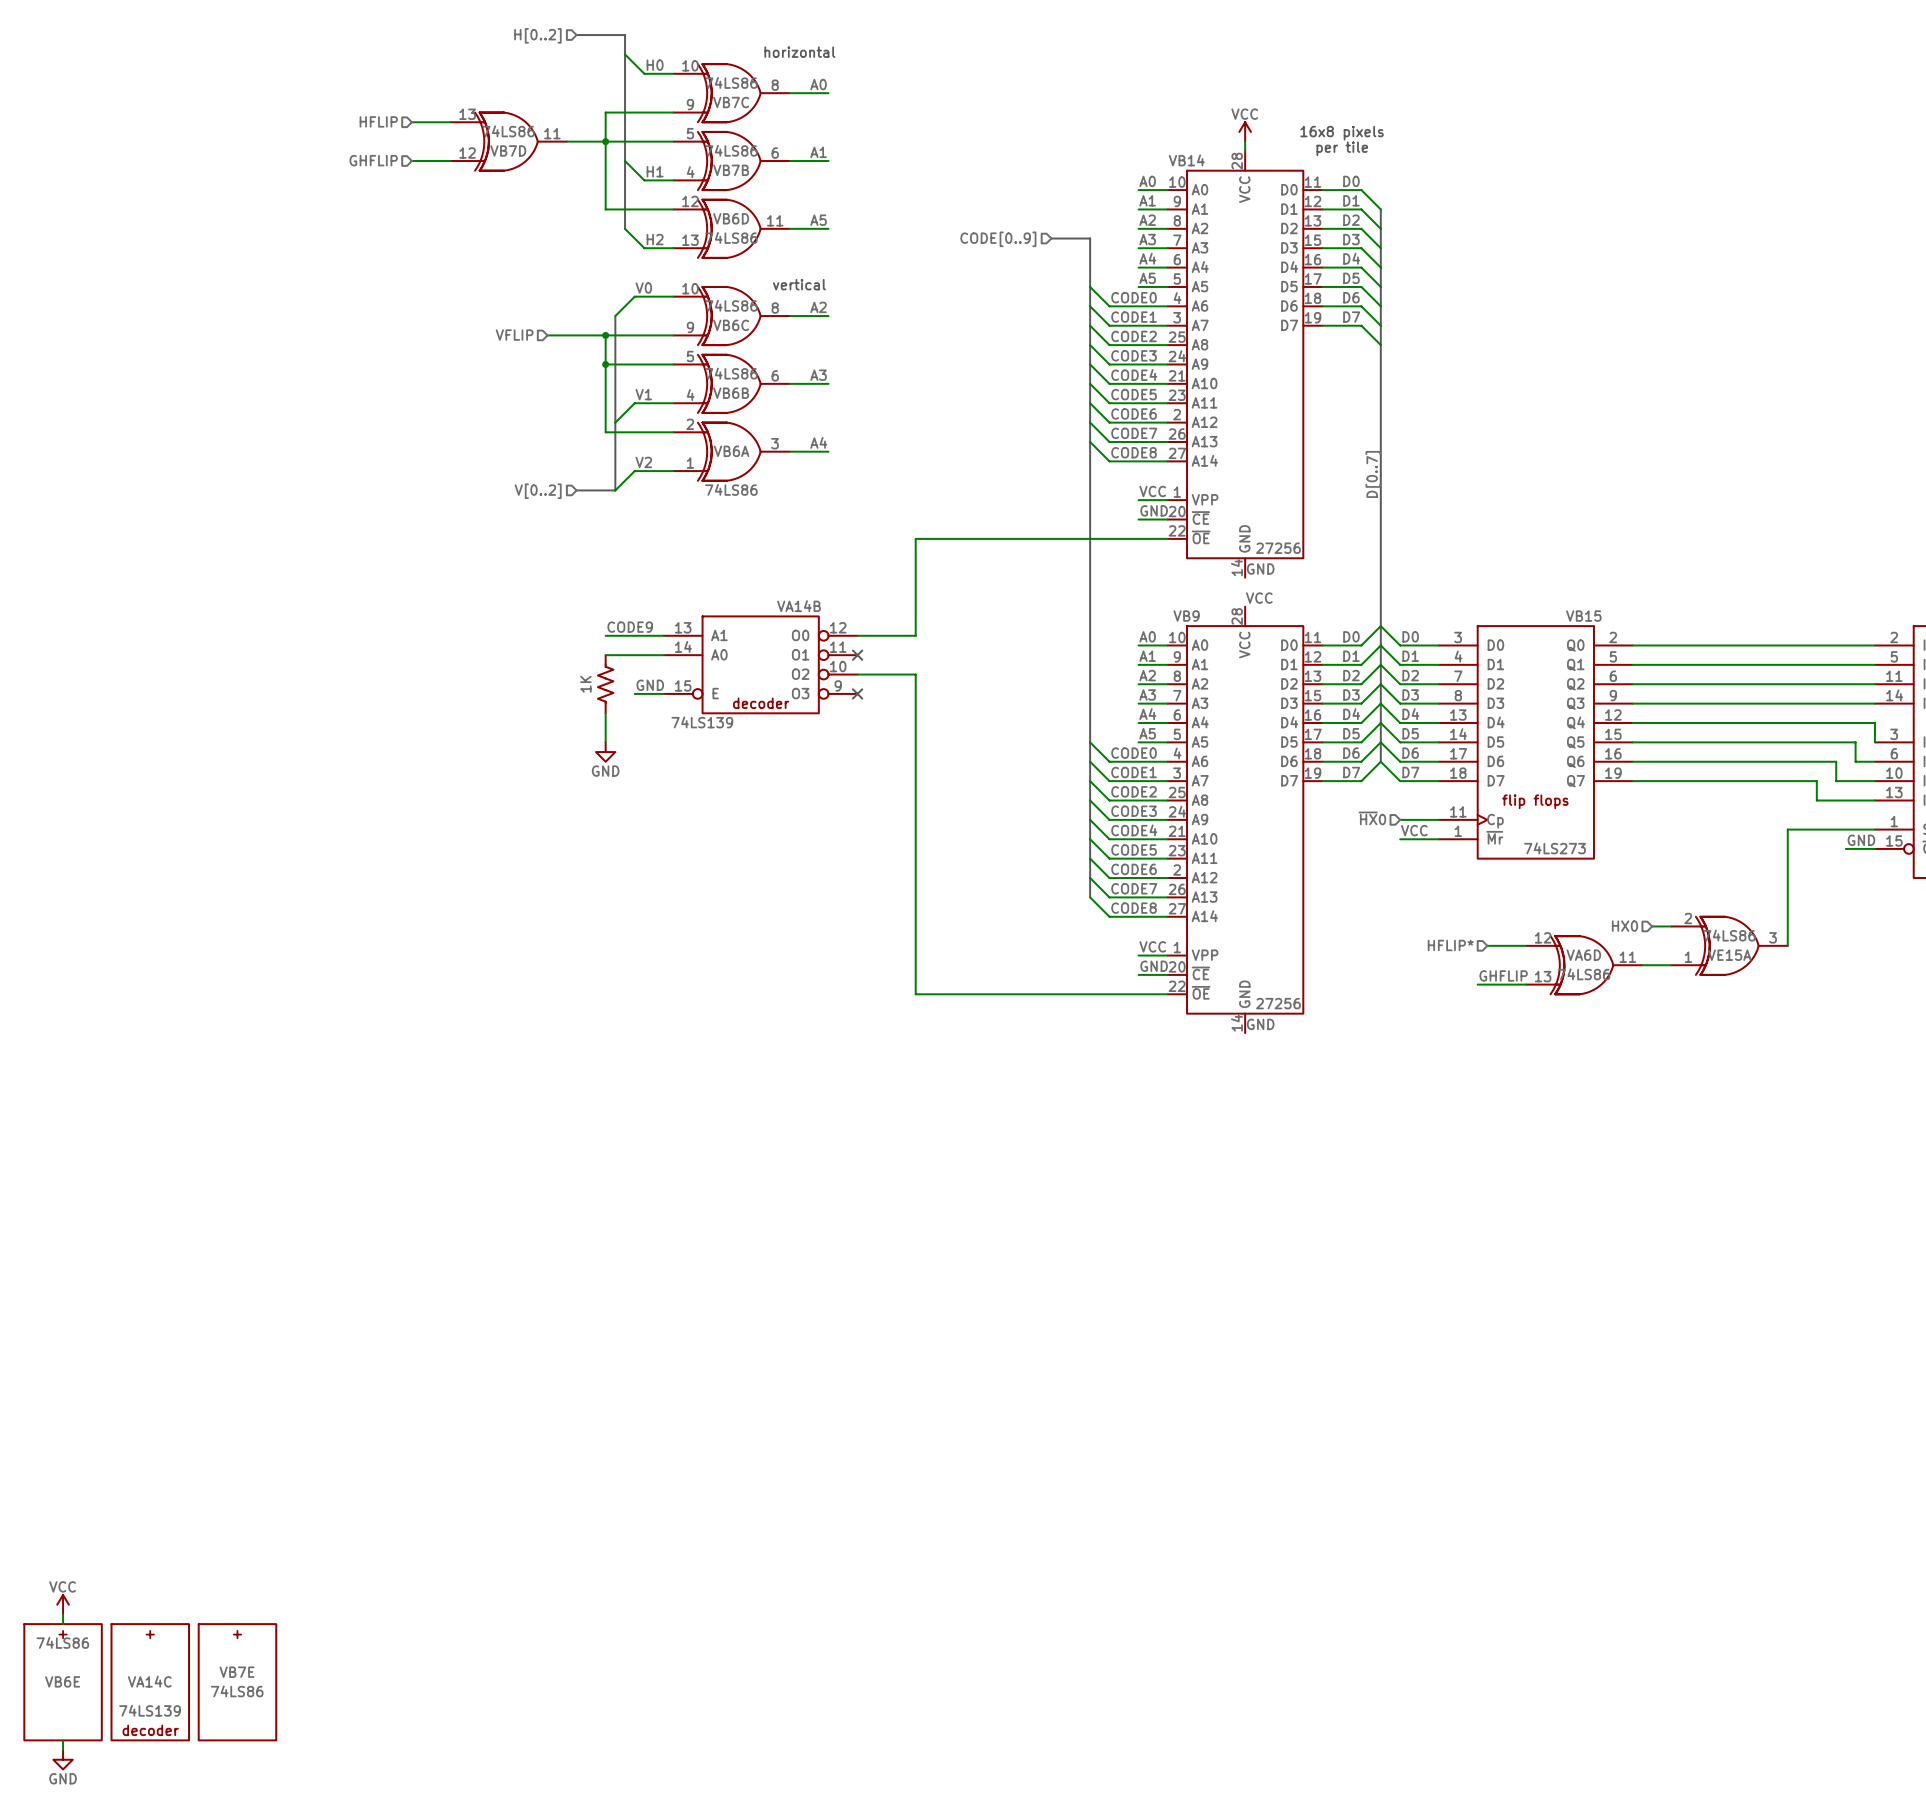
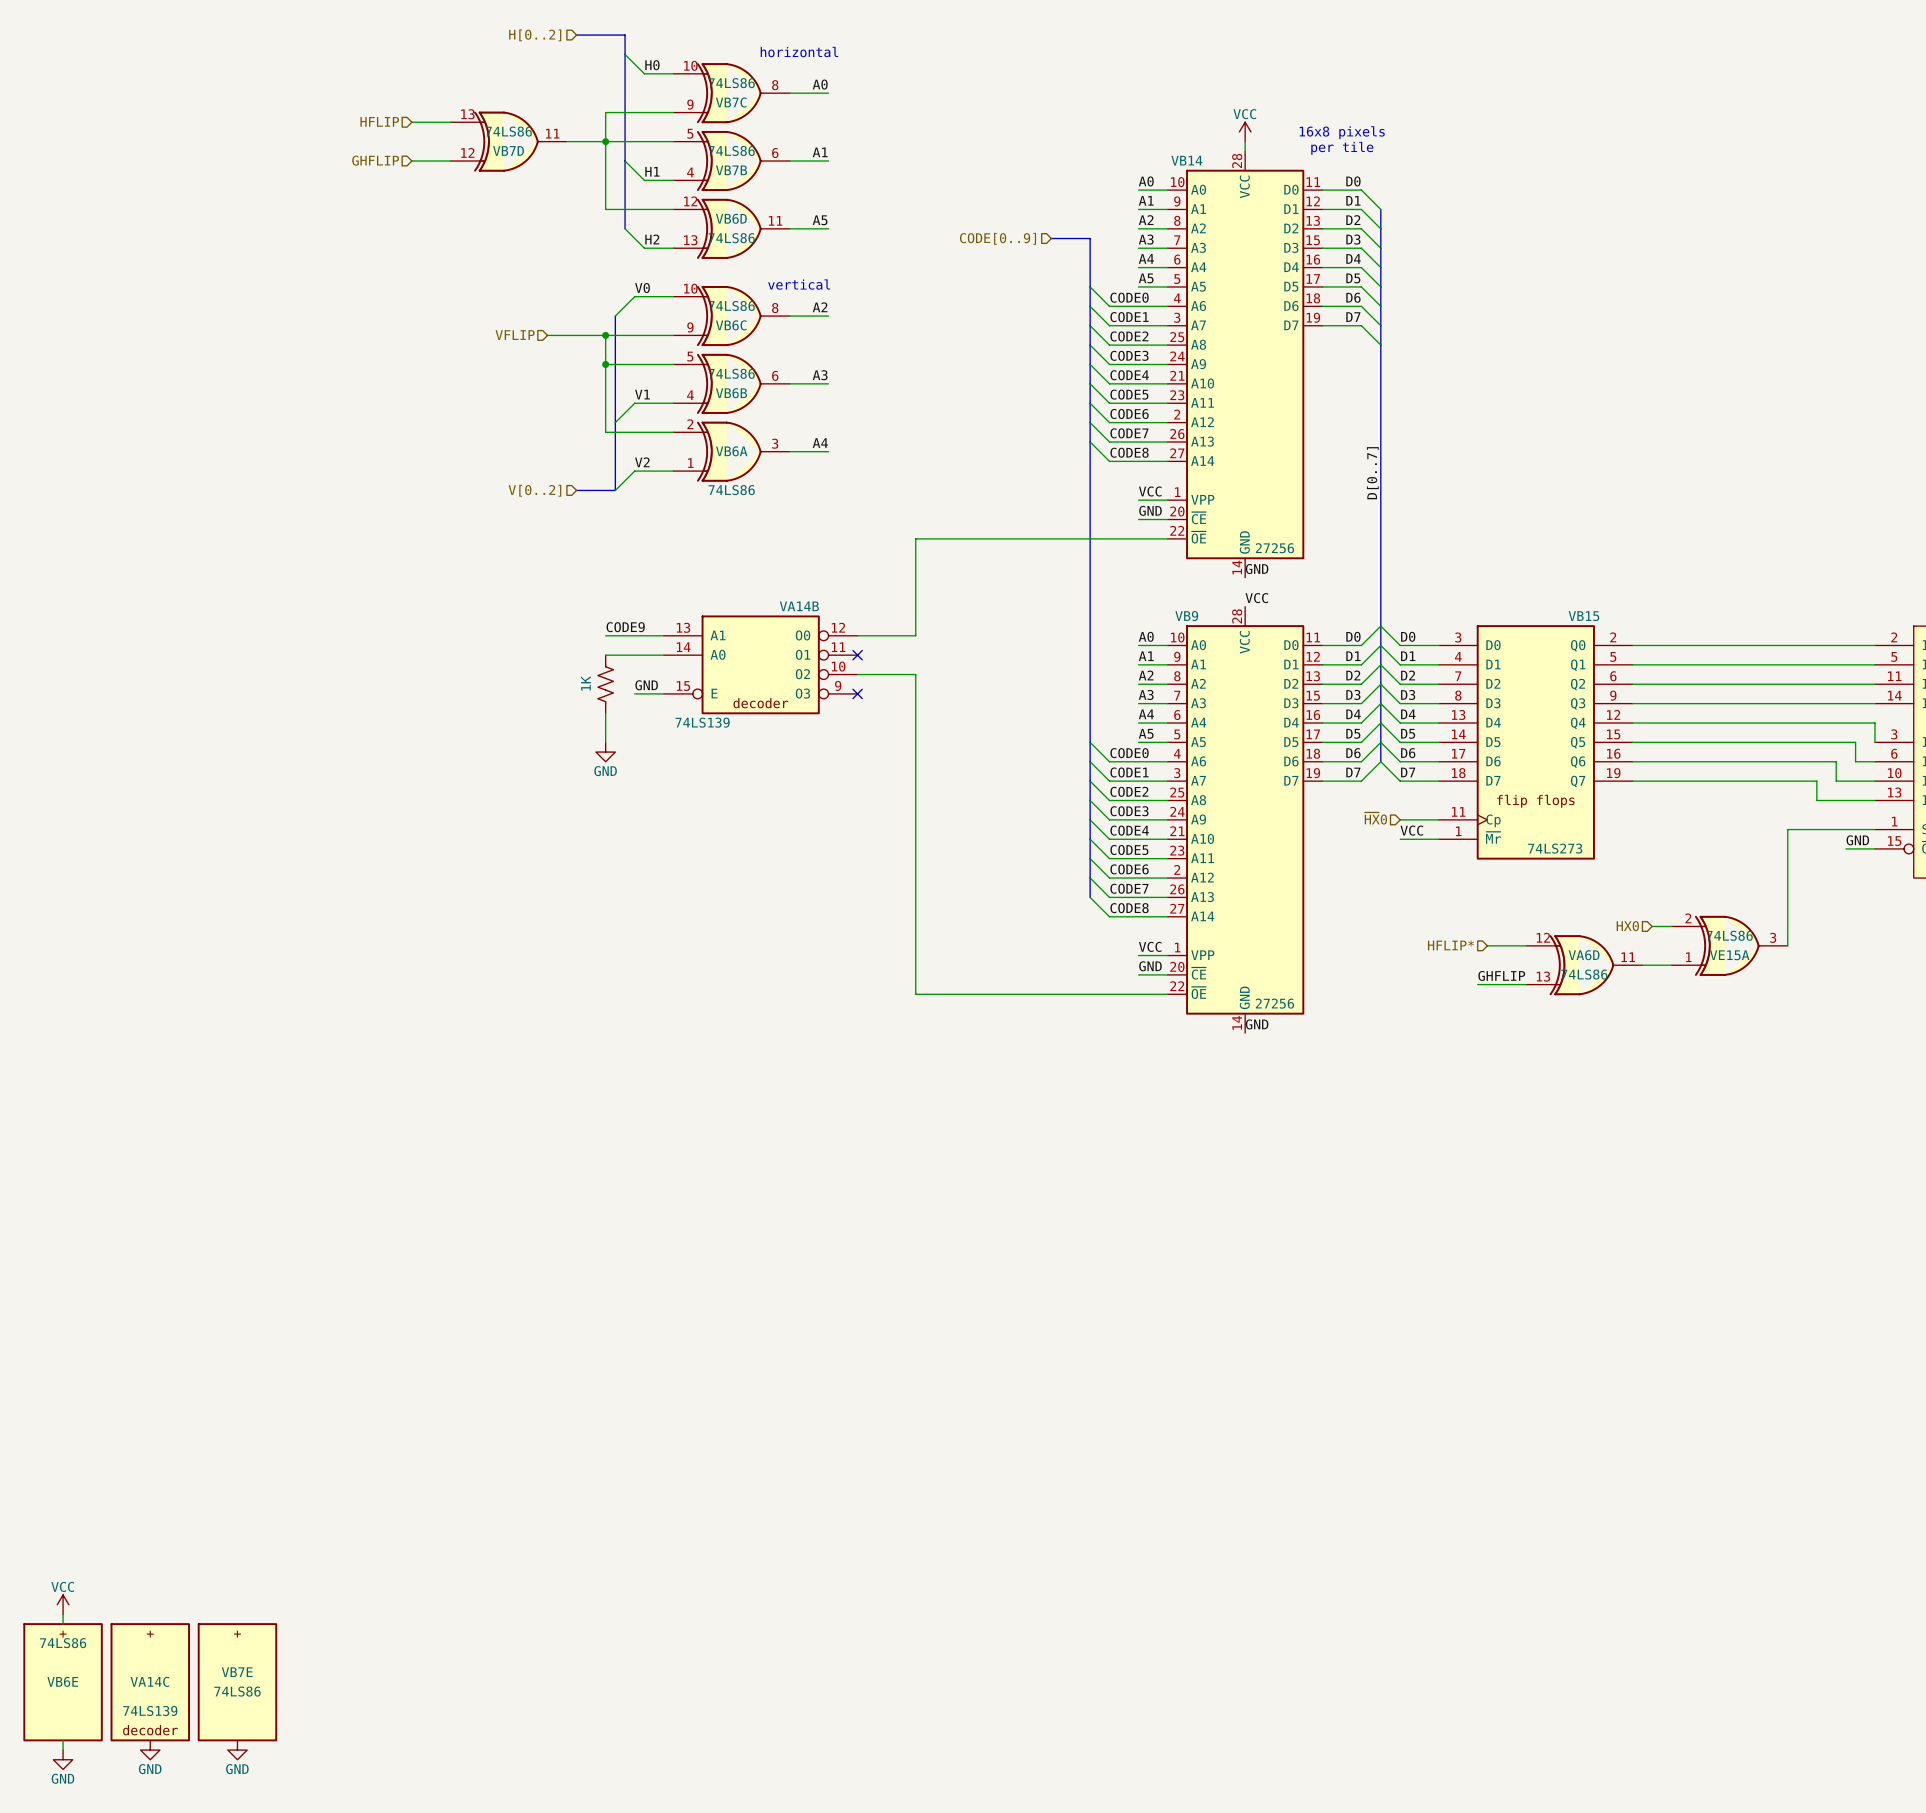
power symbol: none -> GND (150, 1750)
power symbol: none -> GND (237, 1750)

